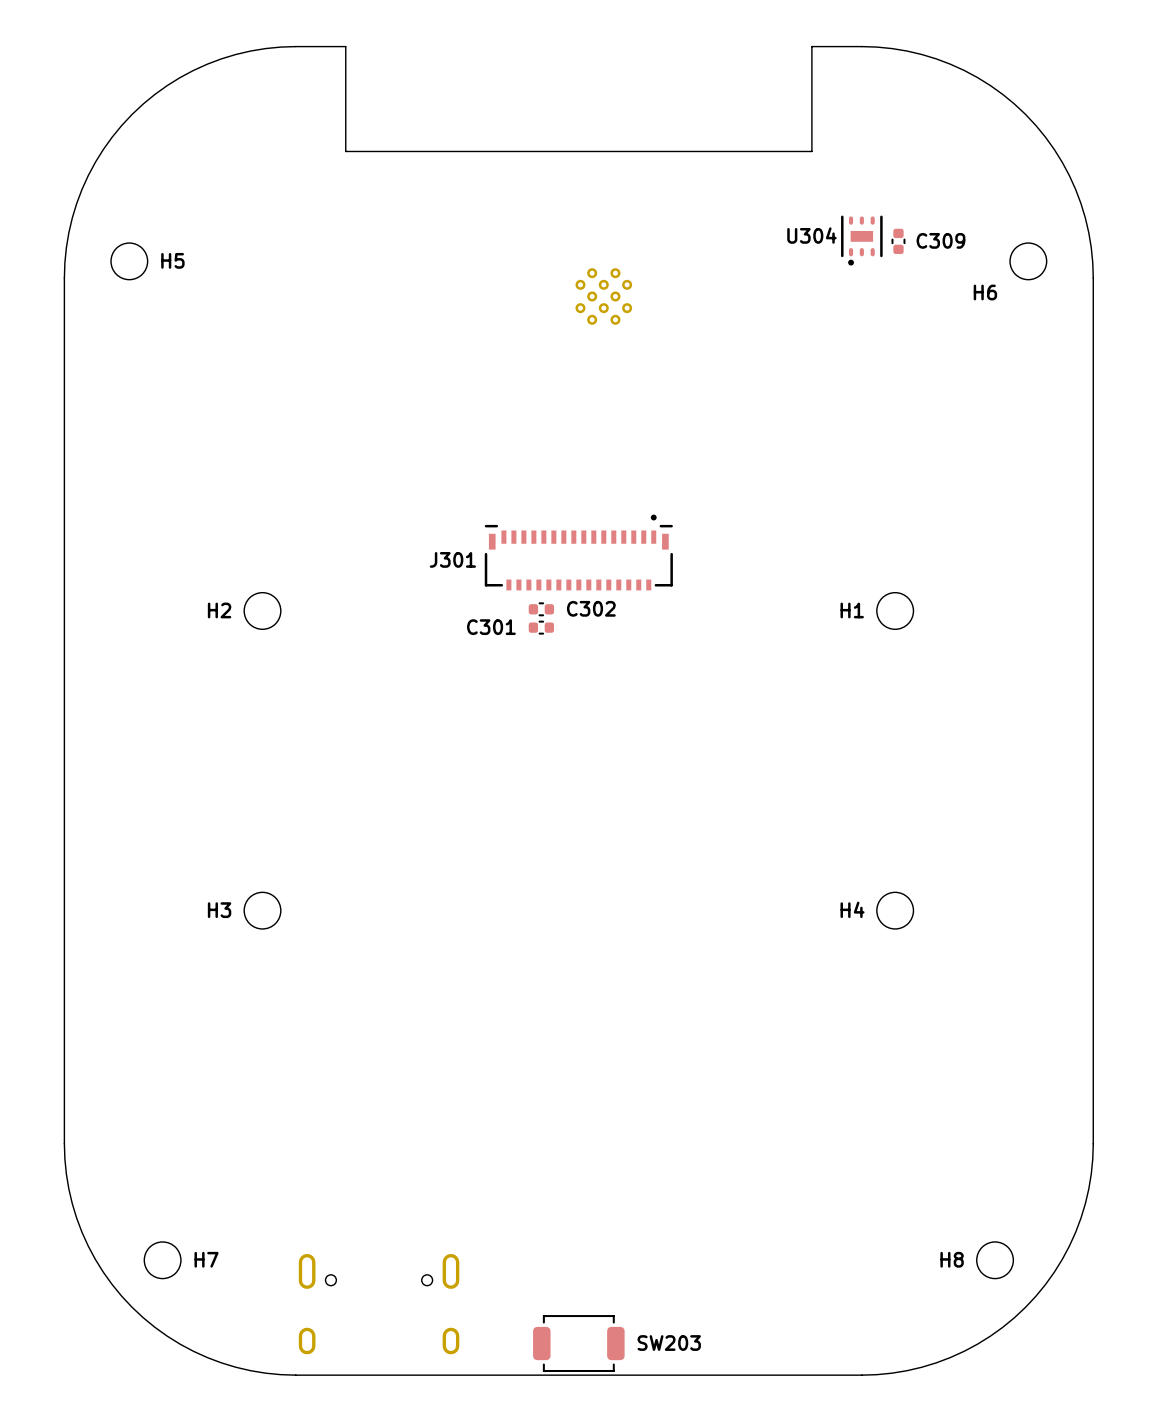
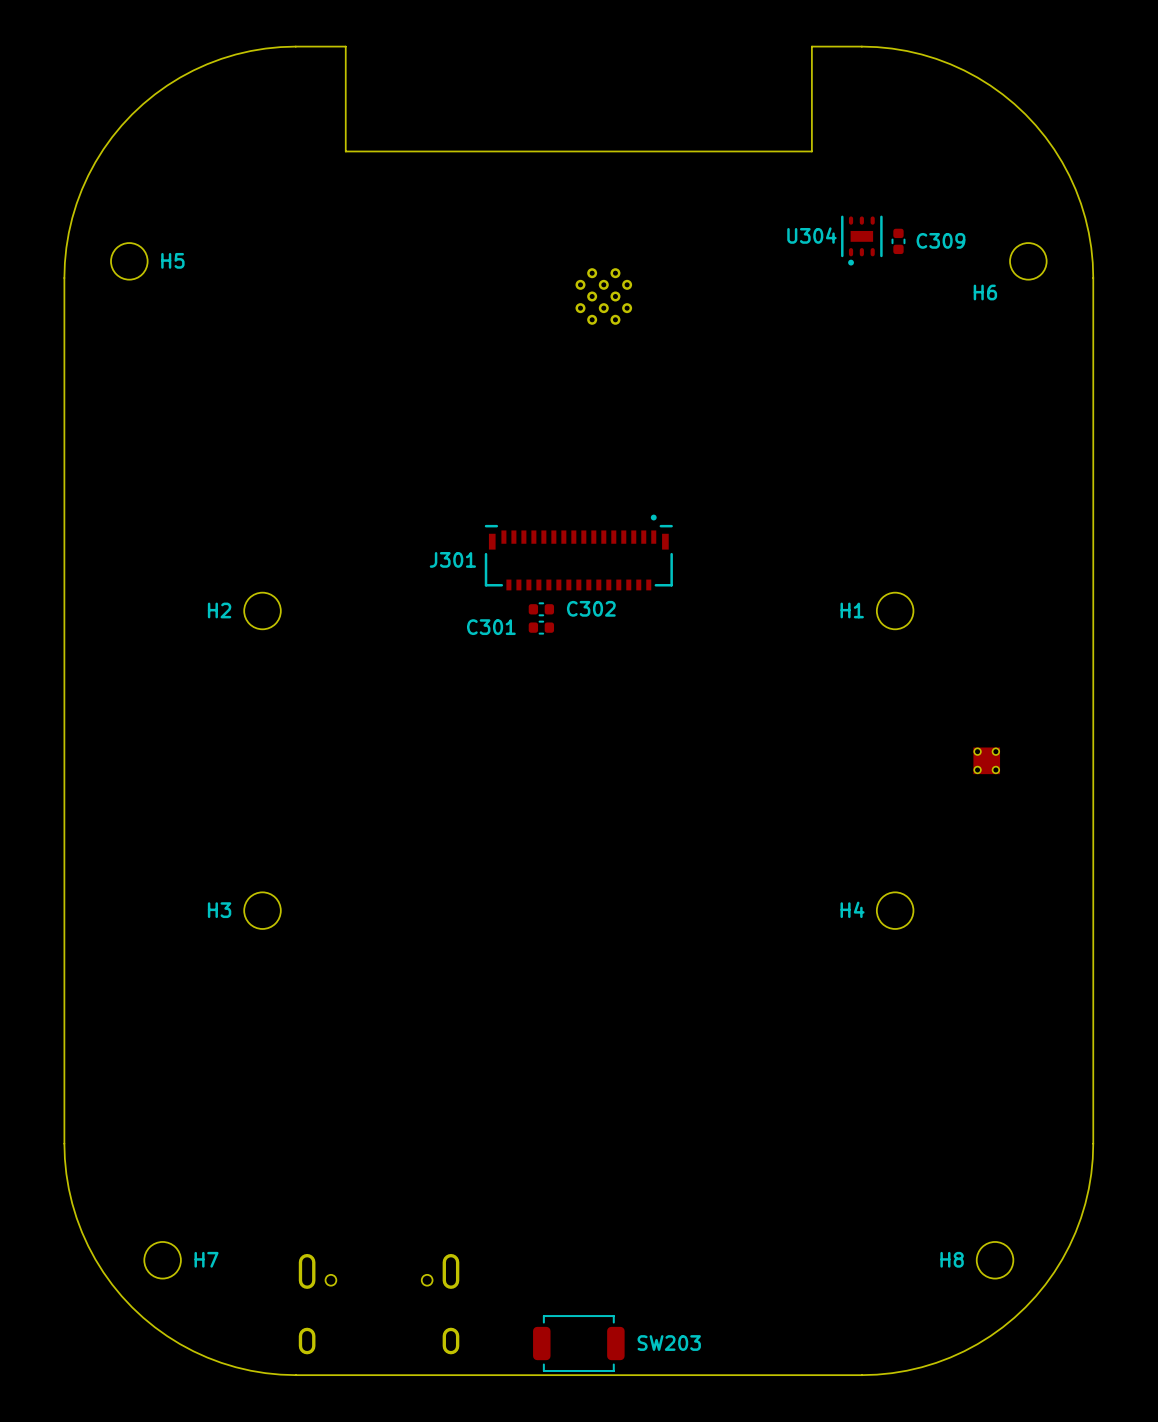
part: none -> (986, 760)

